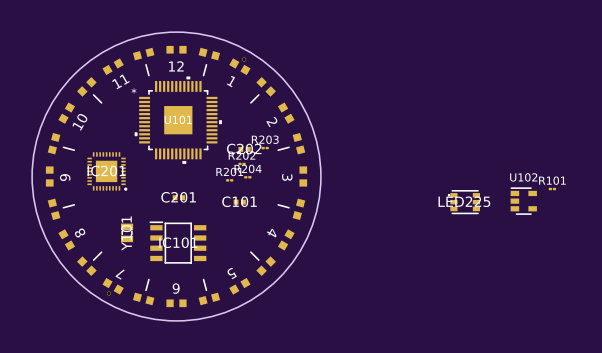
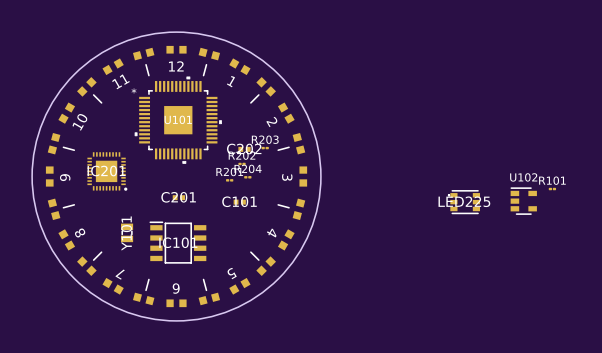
via: (244, 59) -> none
via: (108, 293) -> none

